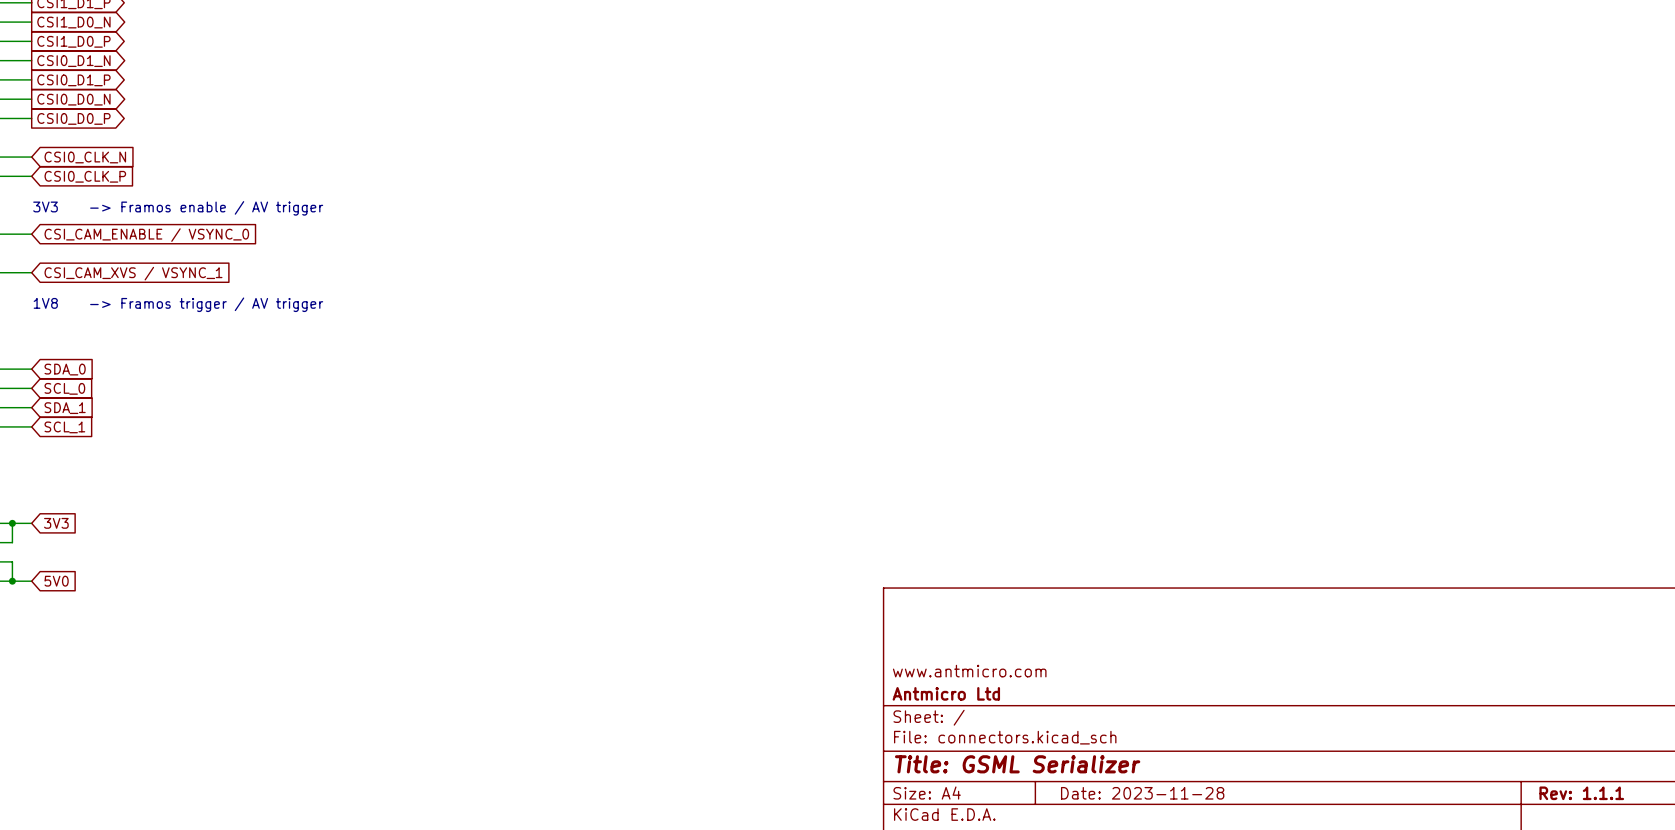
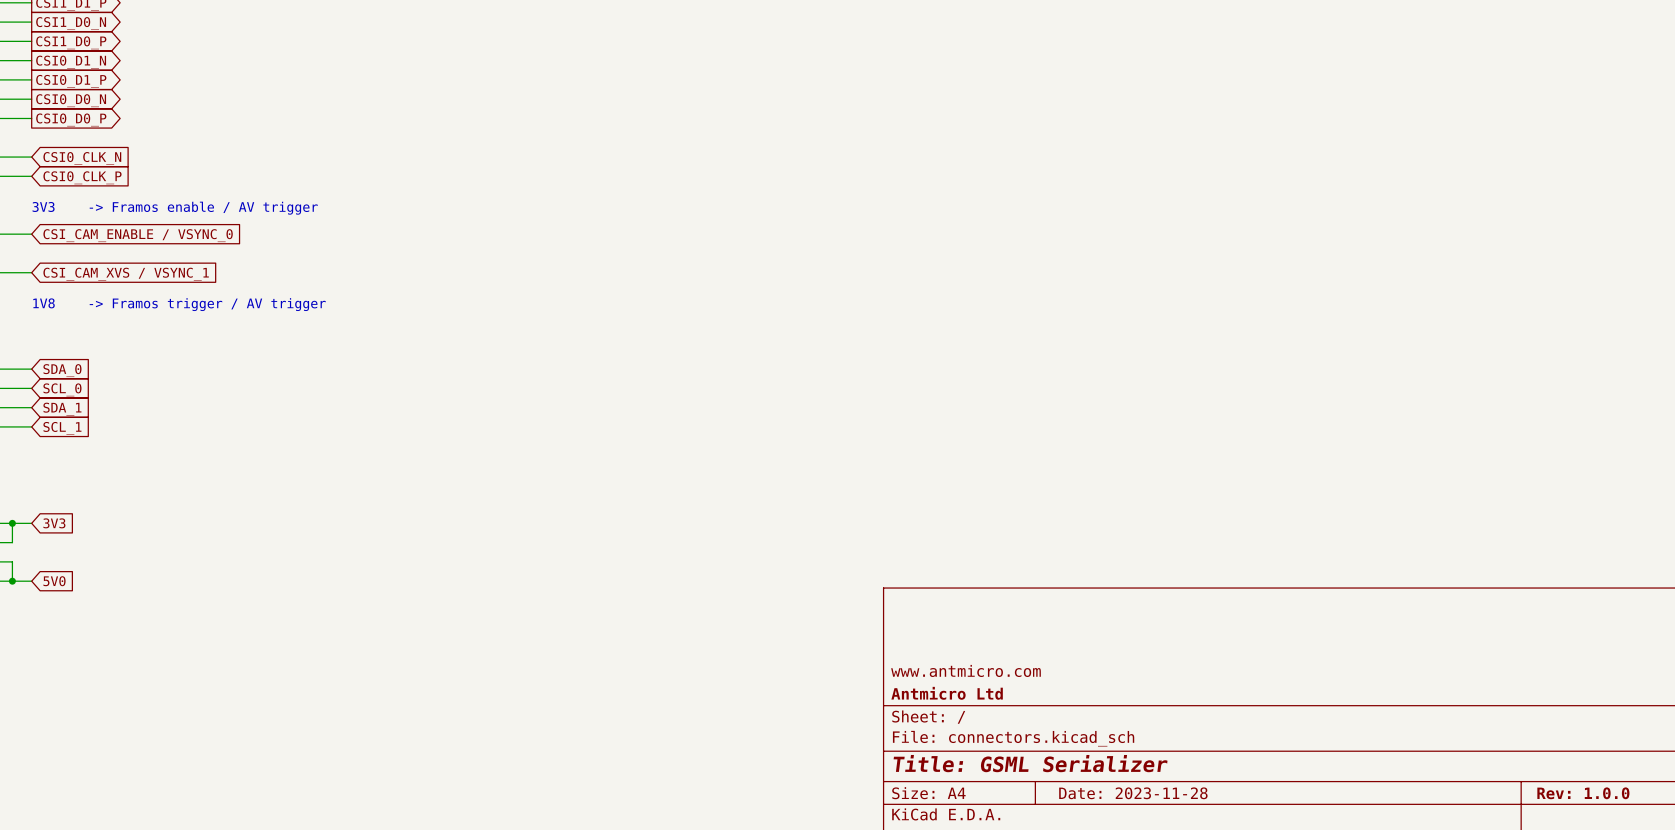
title block: Rev: 1.1.1 (1581, 793) -> Rev: 1.0.0 (1583, 793)

